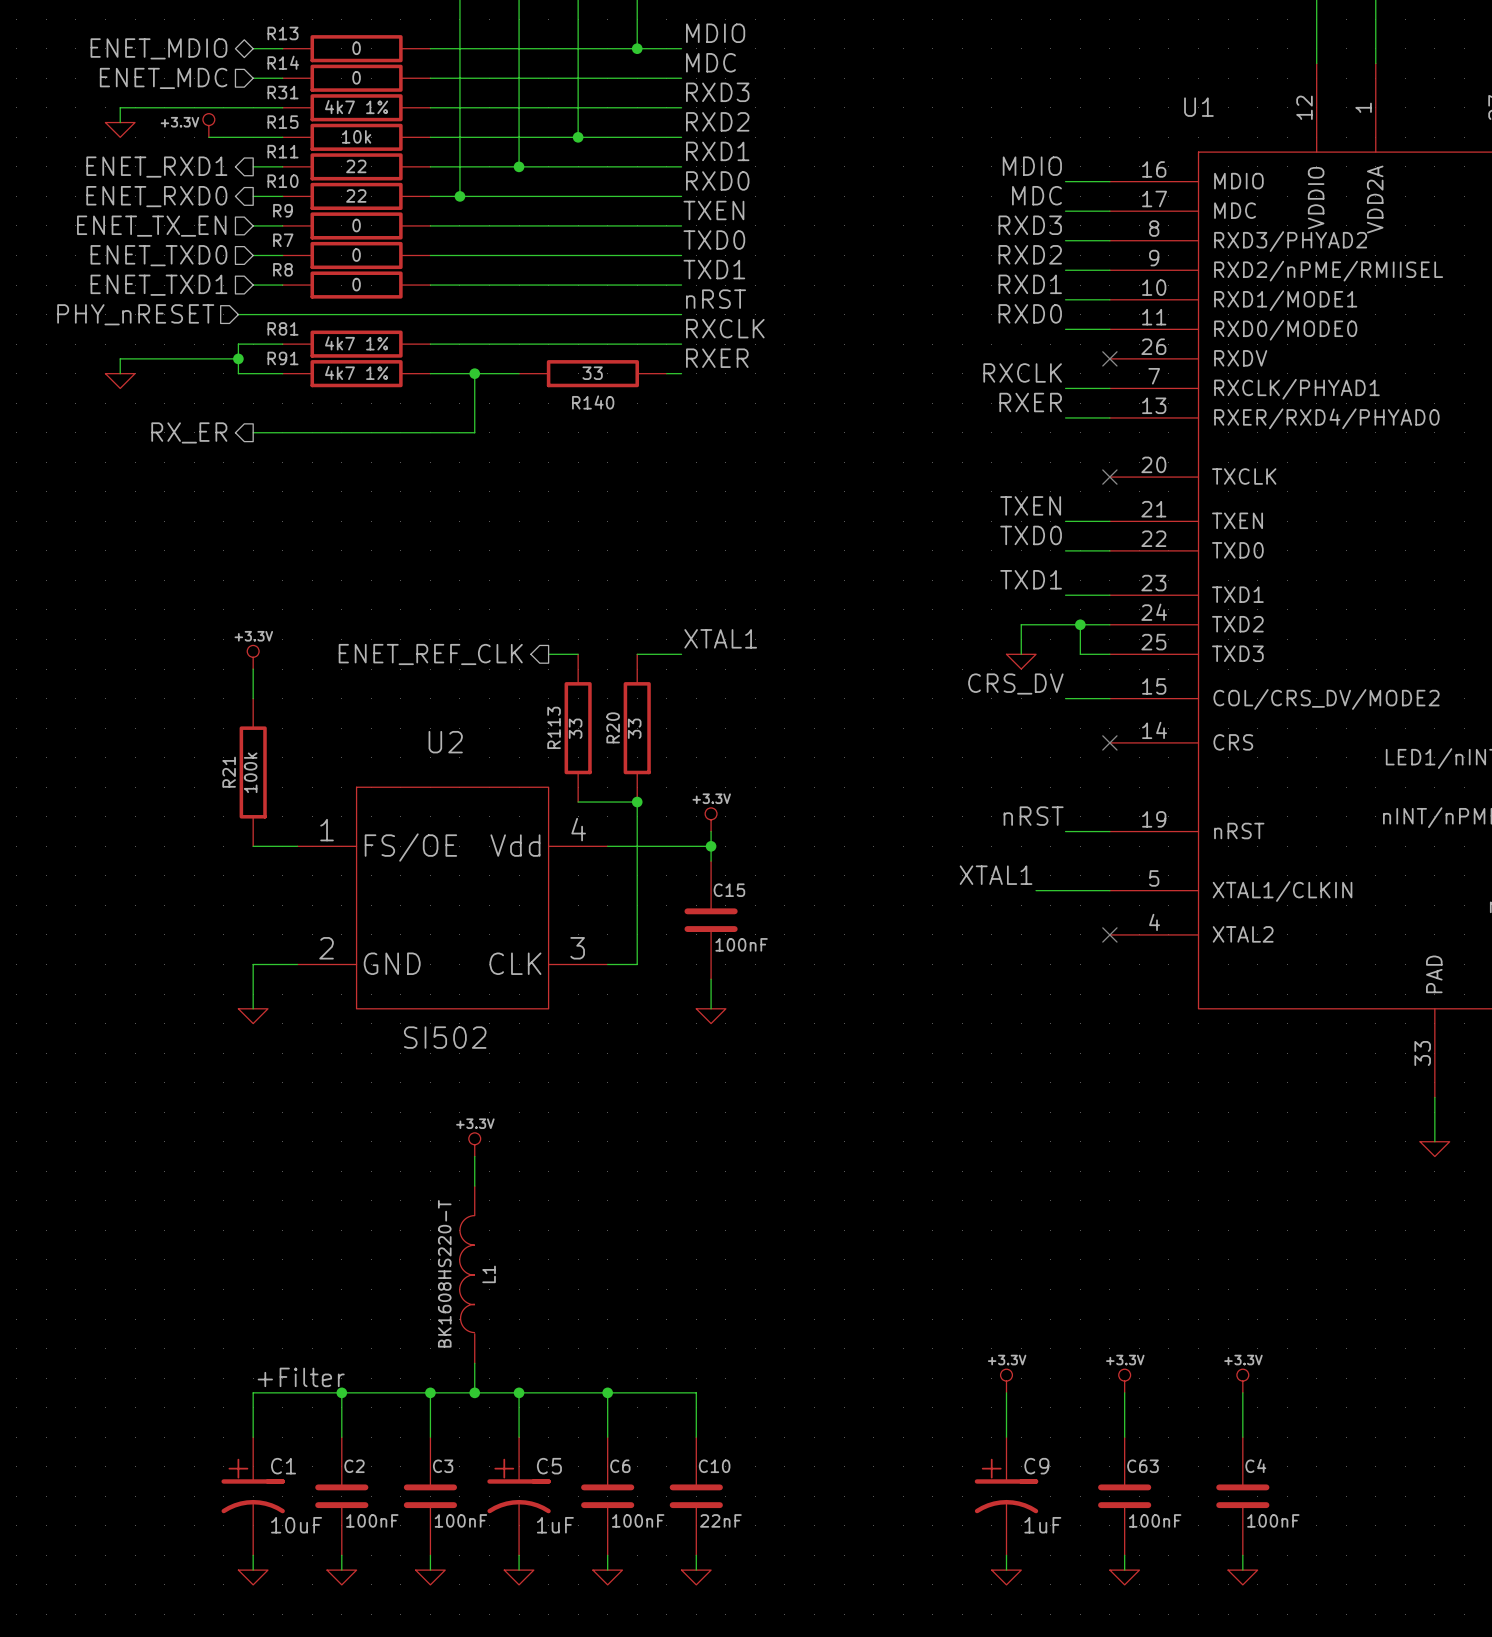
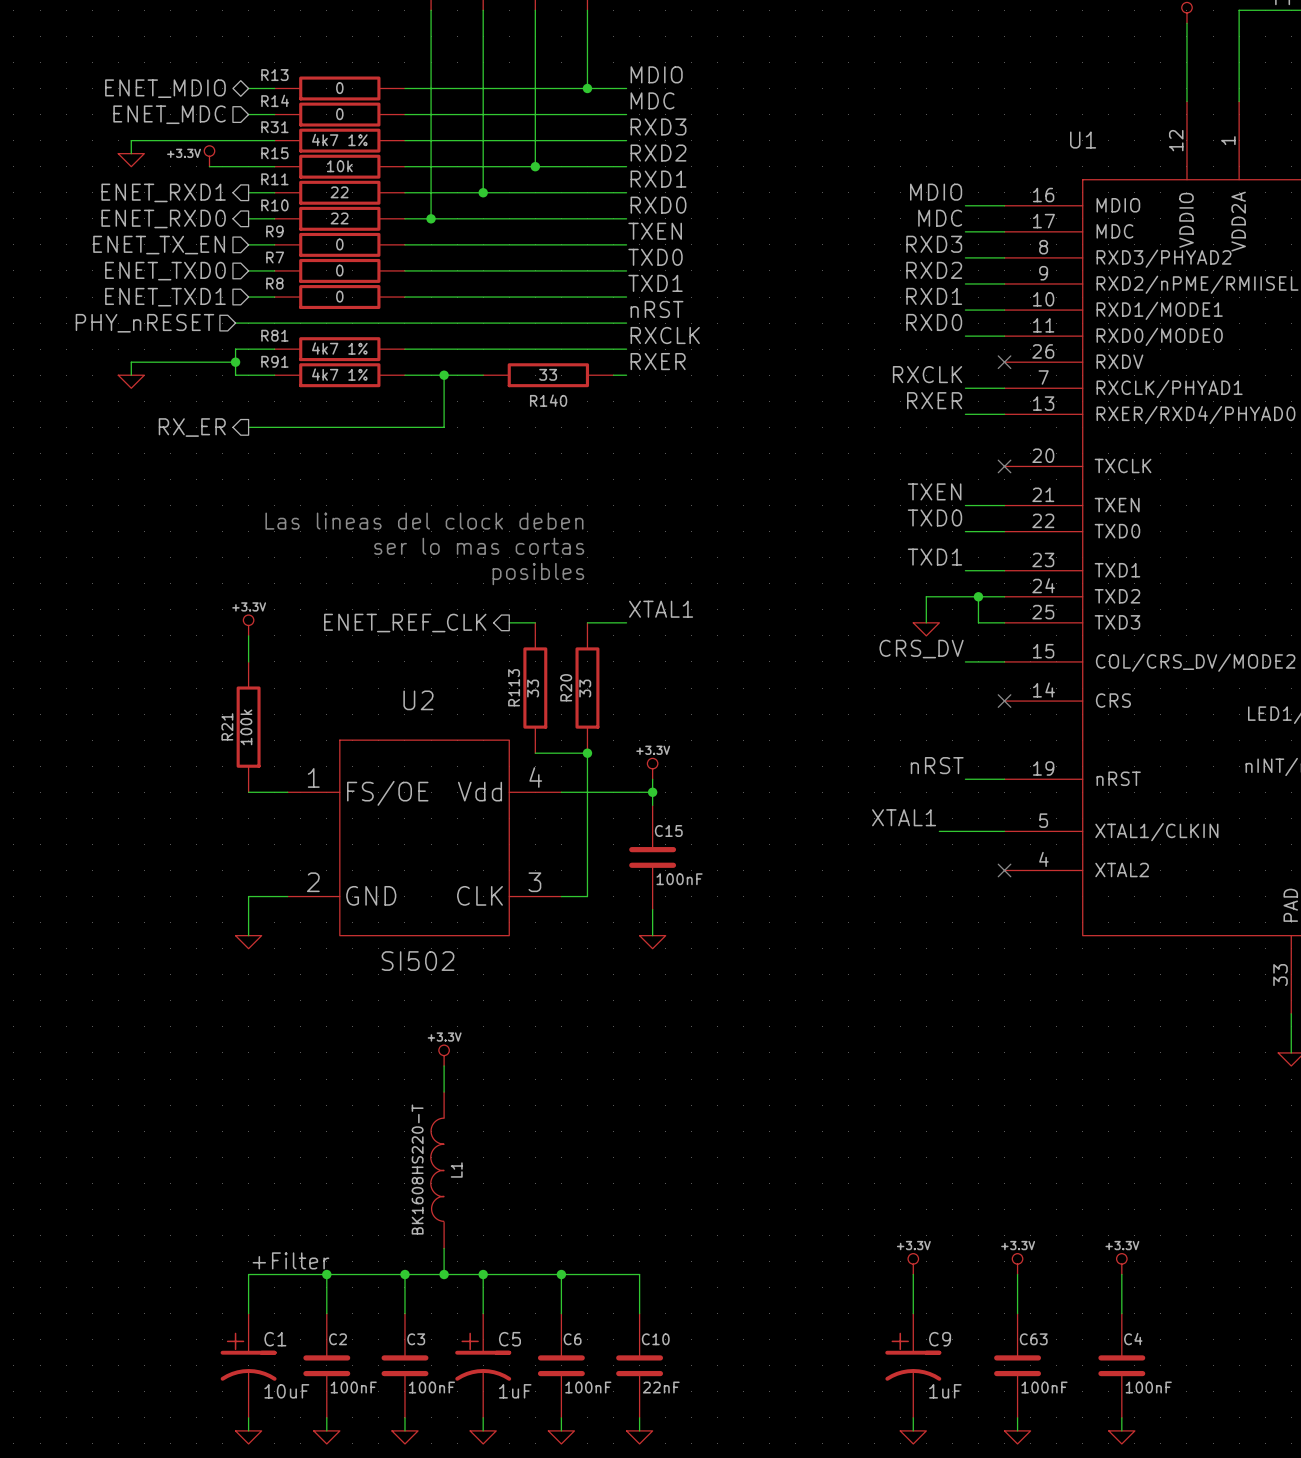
text: none -> Las lineas del clock deben (424, 521)
text: none -> ser lo mas cortas (479, 546)
text: none -> posibles (538, 574)

